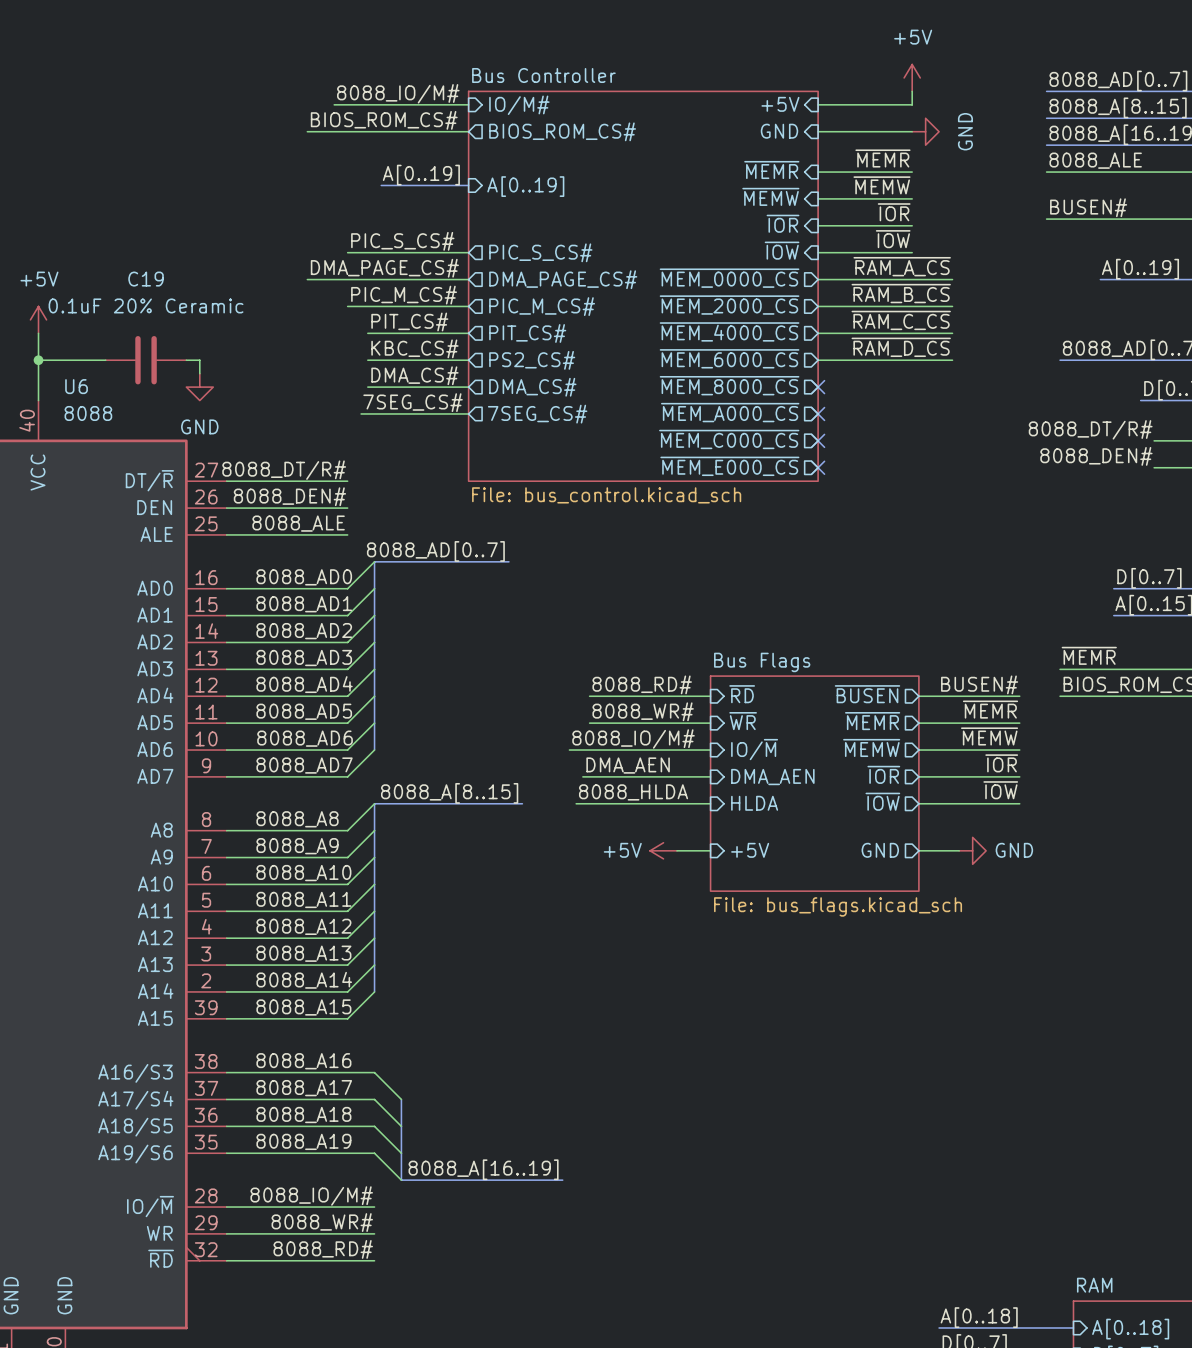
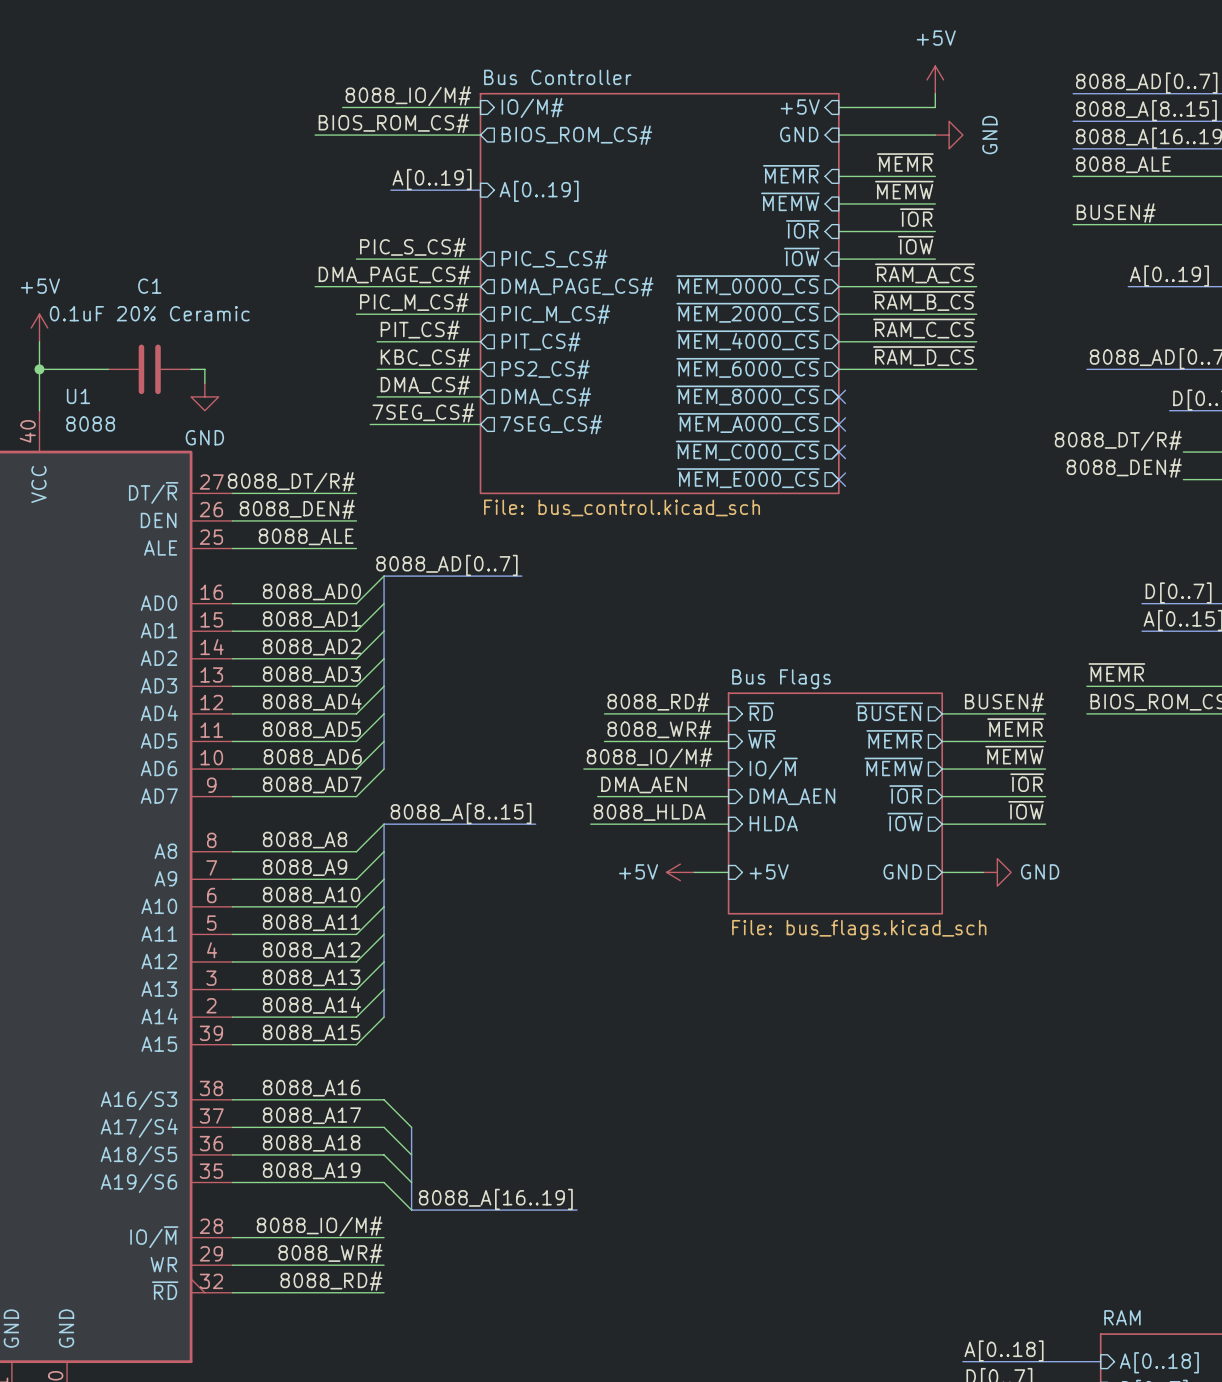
C19 name: C19 (146, 279) -> C1 (149, 286)
U6 name: U6 (76, 386) -> U1 (78, 396)

